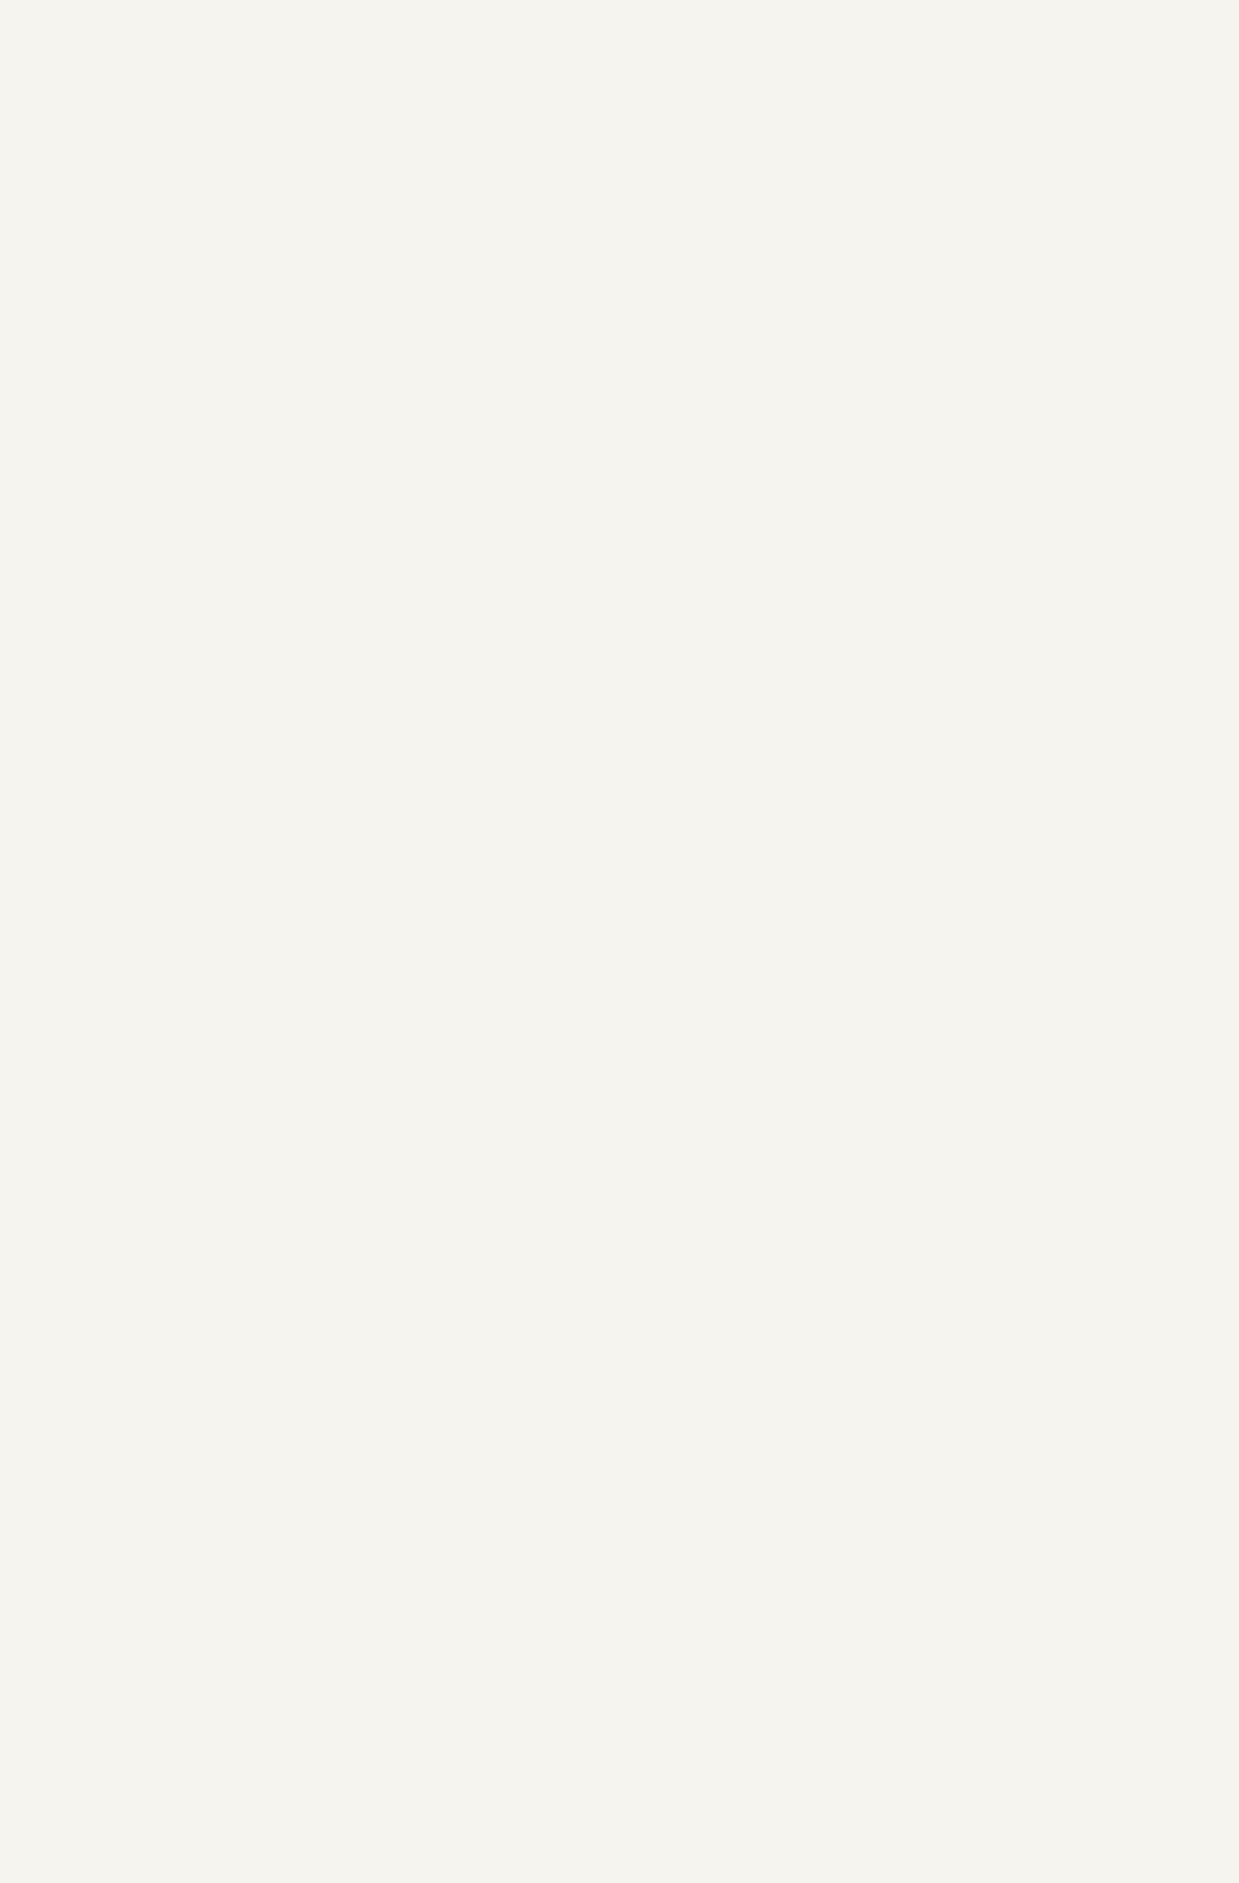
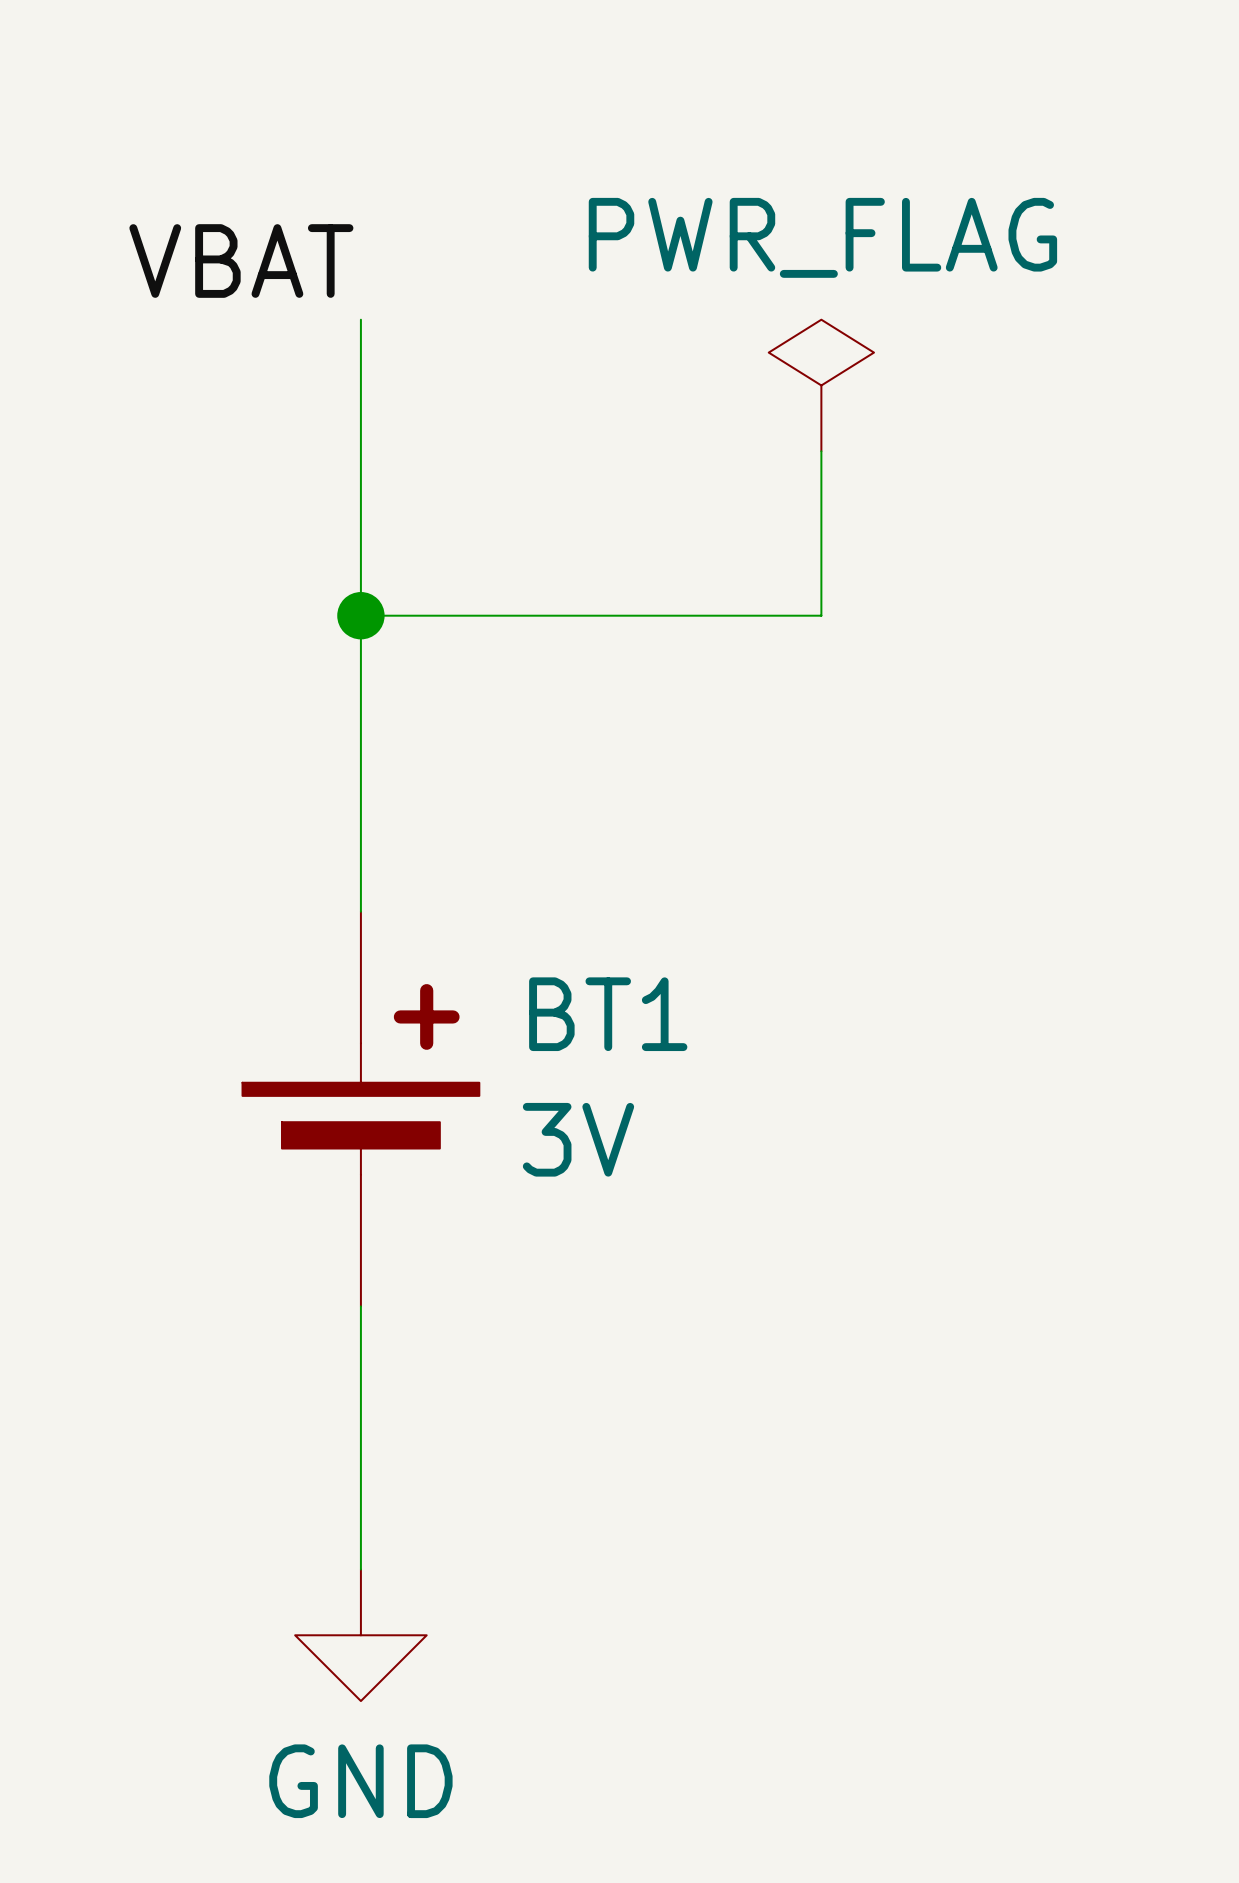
label: none -> VBAT (241, 261)
wire: none -> (360, 319) (360, 911)
power symbol: none -> PWR_FLAG (821, 385)
wire: none -> (821, 451) (821, 615) (360, 615)
junction: none -> (360, 615)
BT1: none -> 3V (360, 1109)
wire: none -> (360, 1306) (360, 1569)
power symbol: none -> GND (360, 1635)

